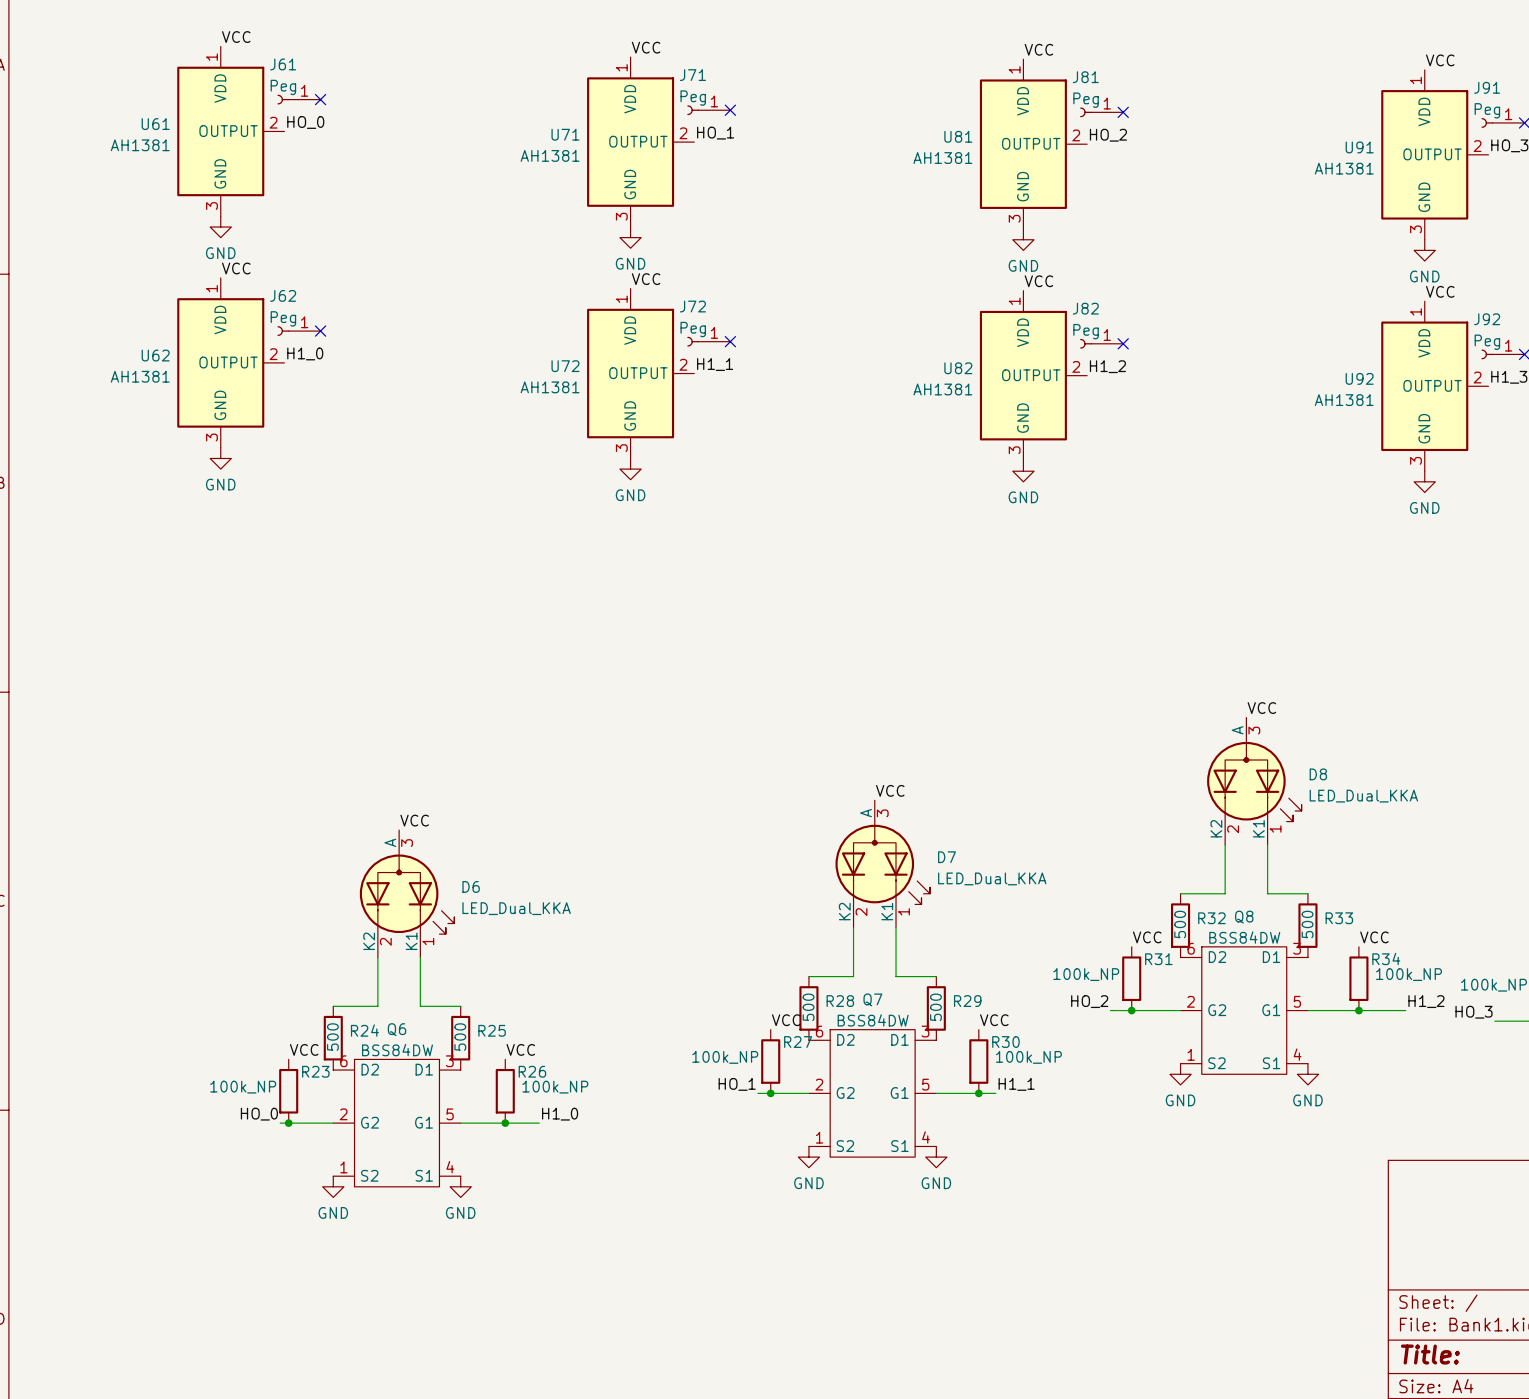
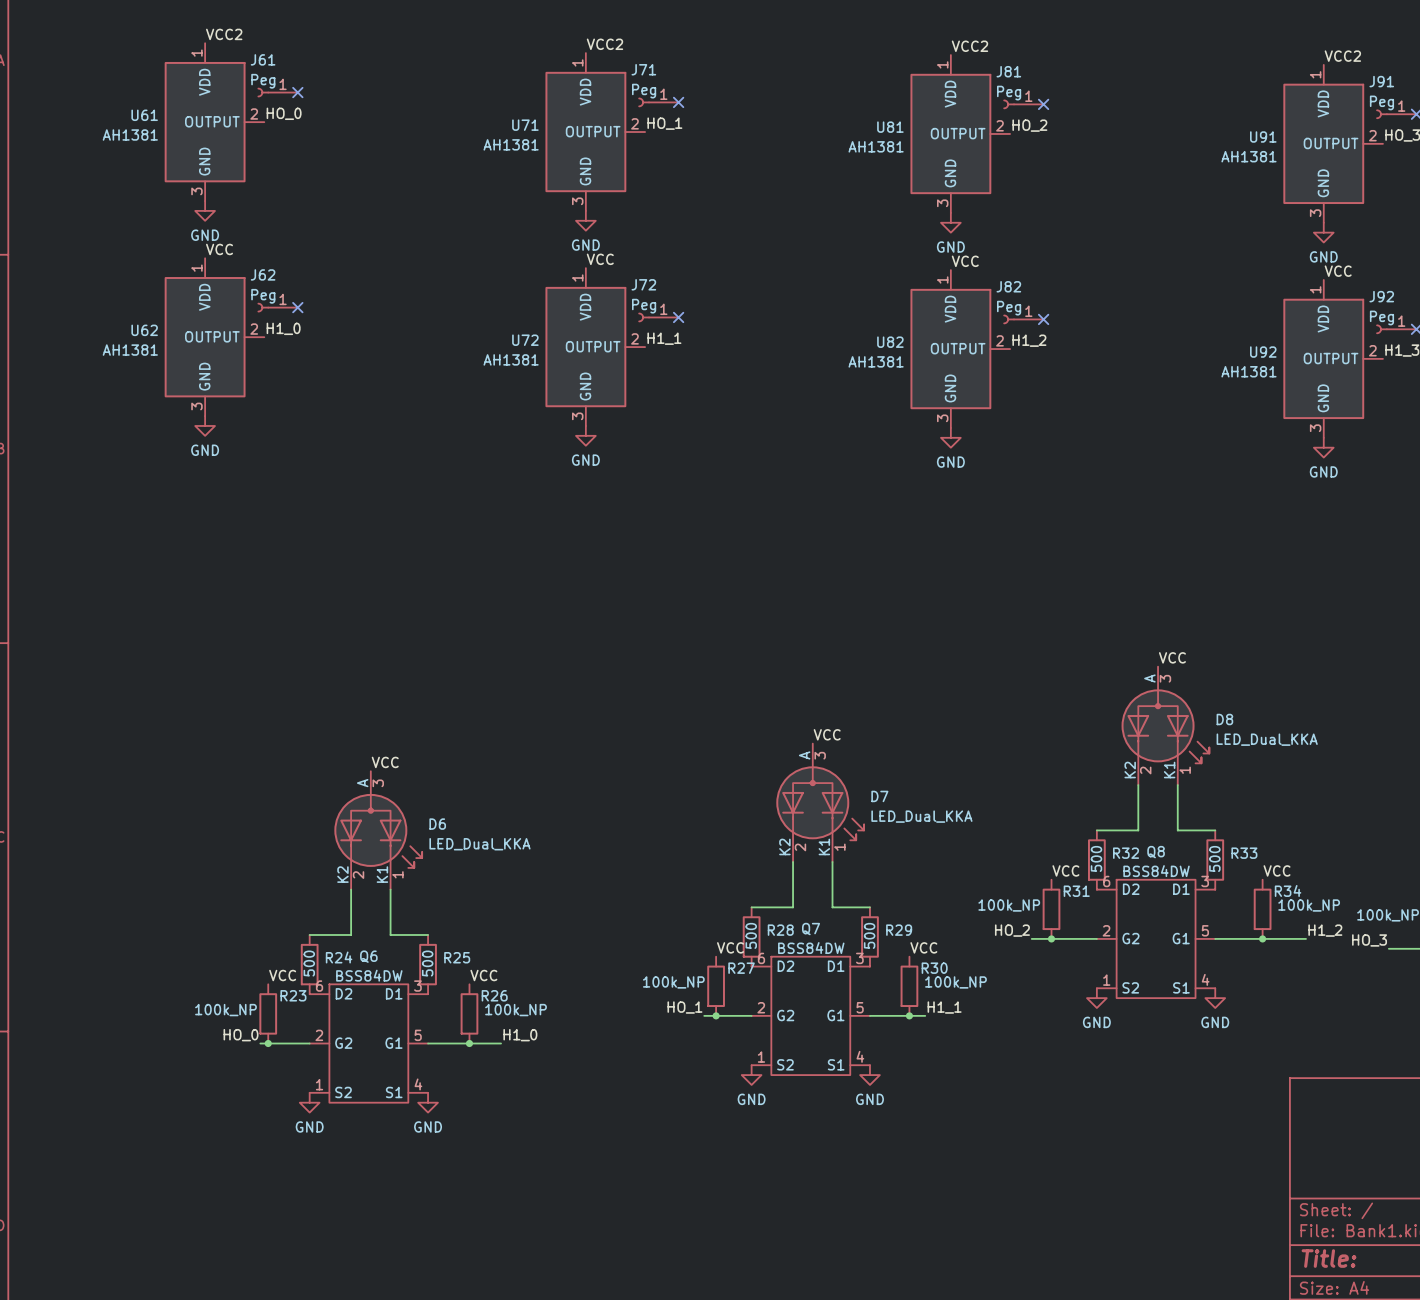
label: VCC (236, 37) -> VCC2 (224, 34)
label: VCC (646, 47) -> VCC2 (604, 44)
label: VCC (1038, 49) -> VCC2 (969, 46)
label: VCC (1440, 60) -> VCC2 (1342, 56)

